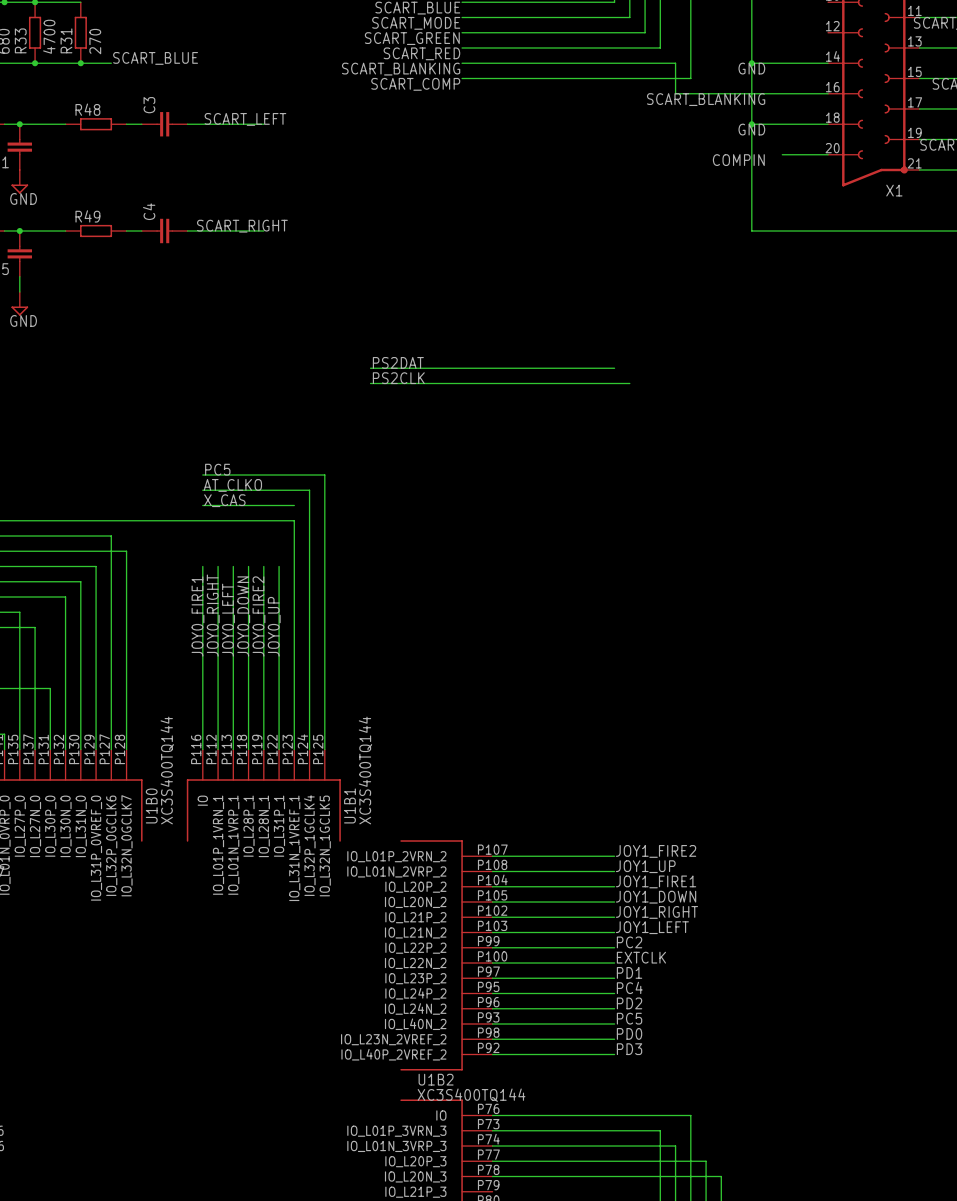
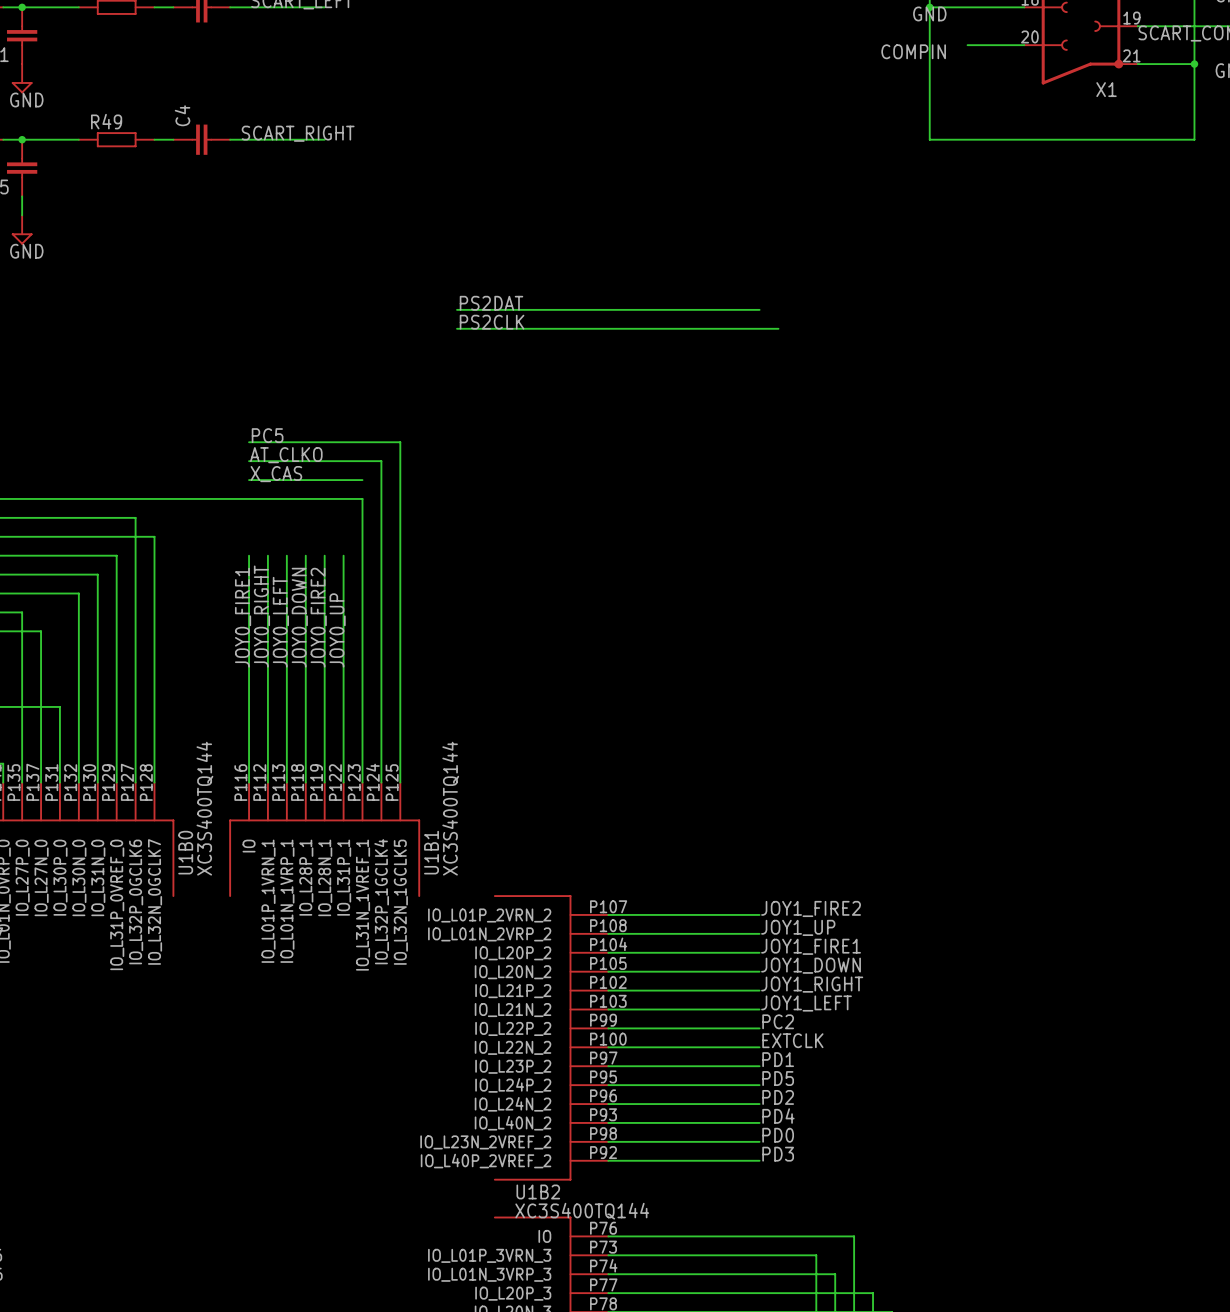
label: PC4 (629, 987) -> PD5 (778, 1078)
label: PC5 (629, 1018) -> PD4 (778, 1116)

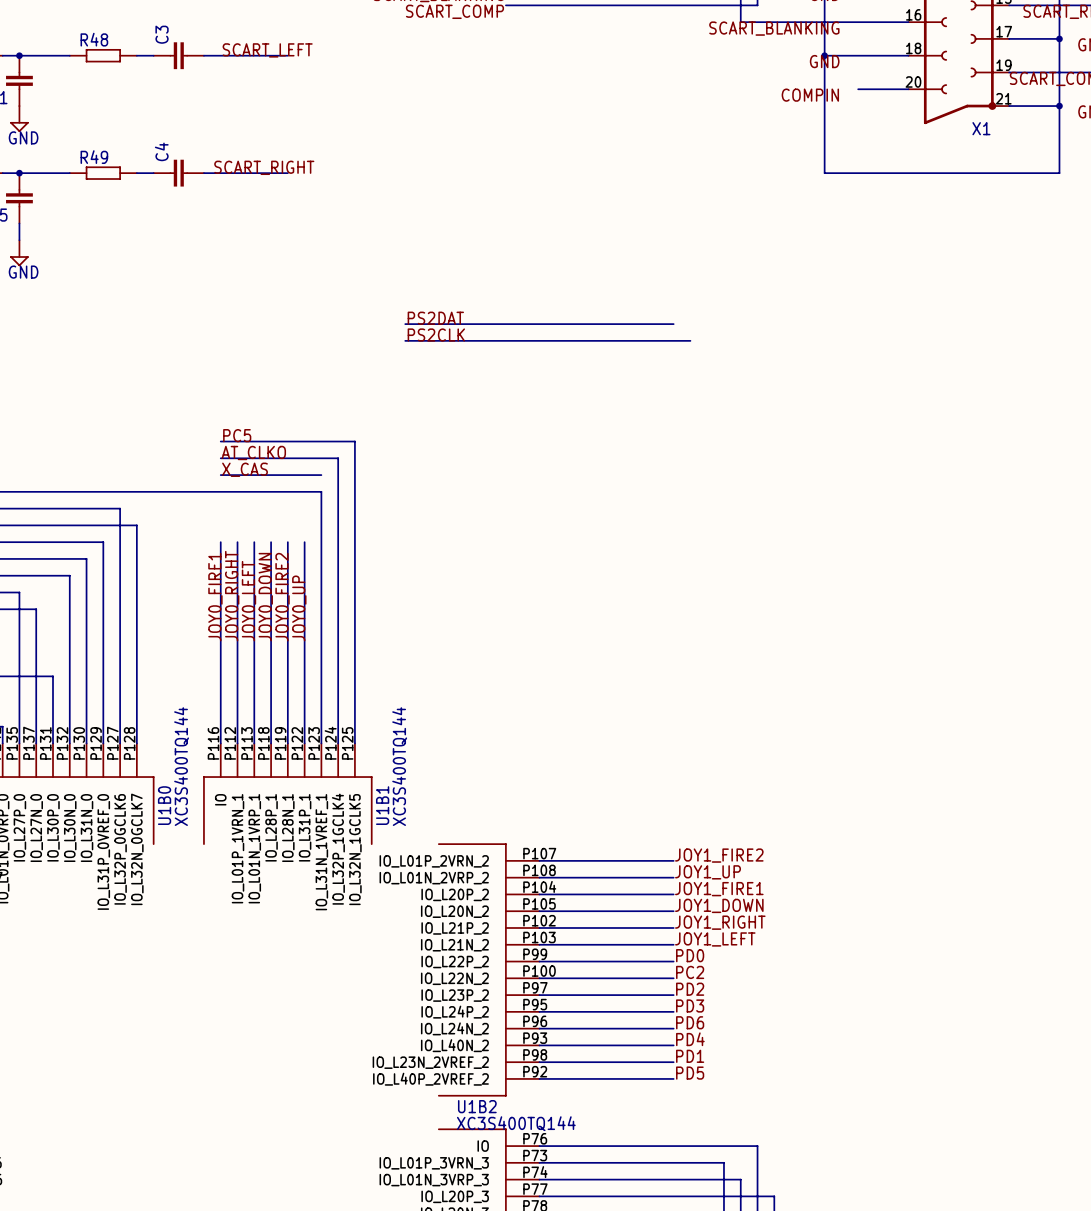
label: PC2 (778, 1021) -> PD0 (690, 955)
label: EXTCLK (792, 1040) -> PC2 (690, 972)
label: PD1 (778, 1059) -> PD2 (690, 989)
label: PD5 (778, 1078) -> PD3 (690, 1005)
label: PD2 (778, 1097) -> PD6 (690, 1022)
label: PD0 (778, 1135) -> PD1 (690, 1056)
label: PD3 (778, 1154) -> PD5 (690, 1073)

